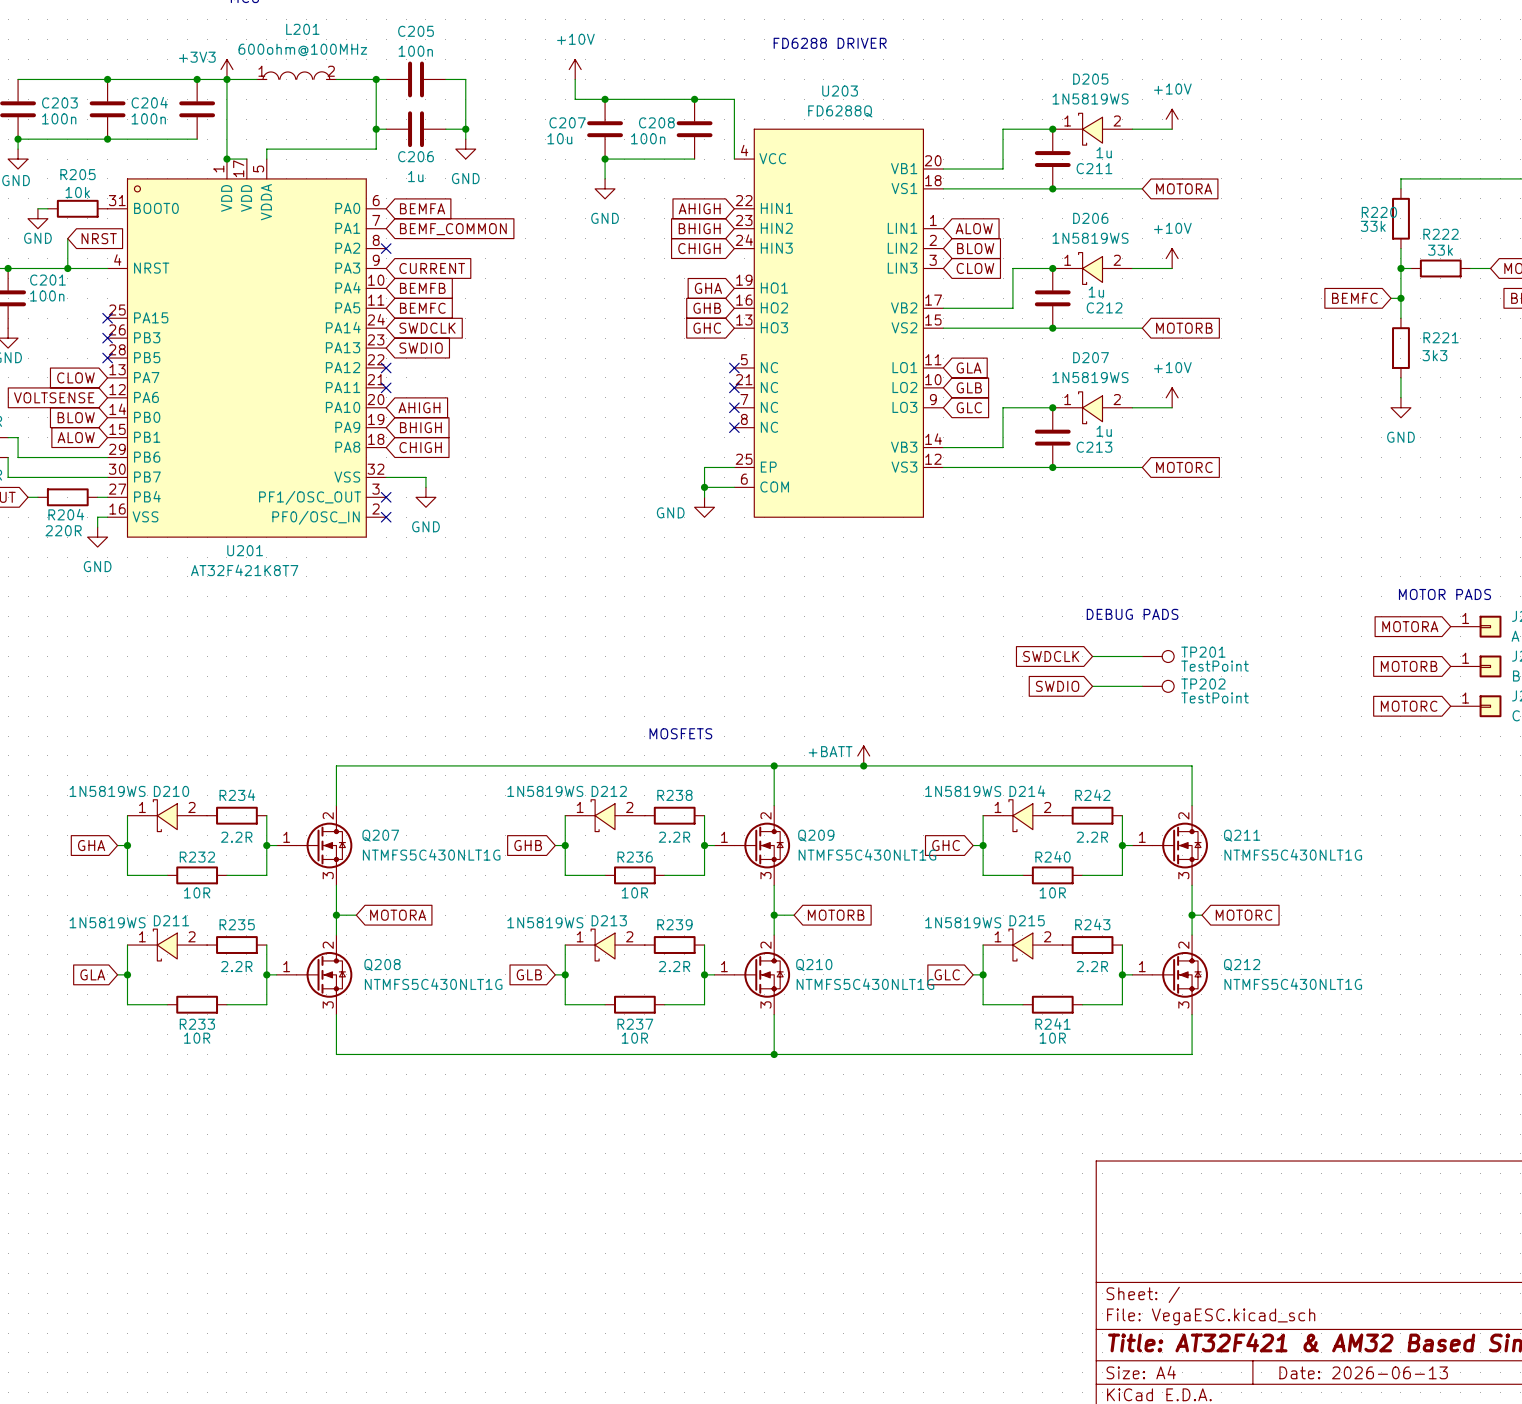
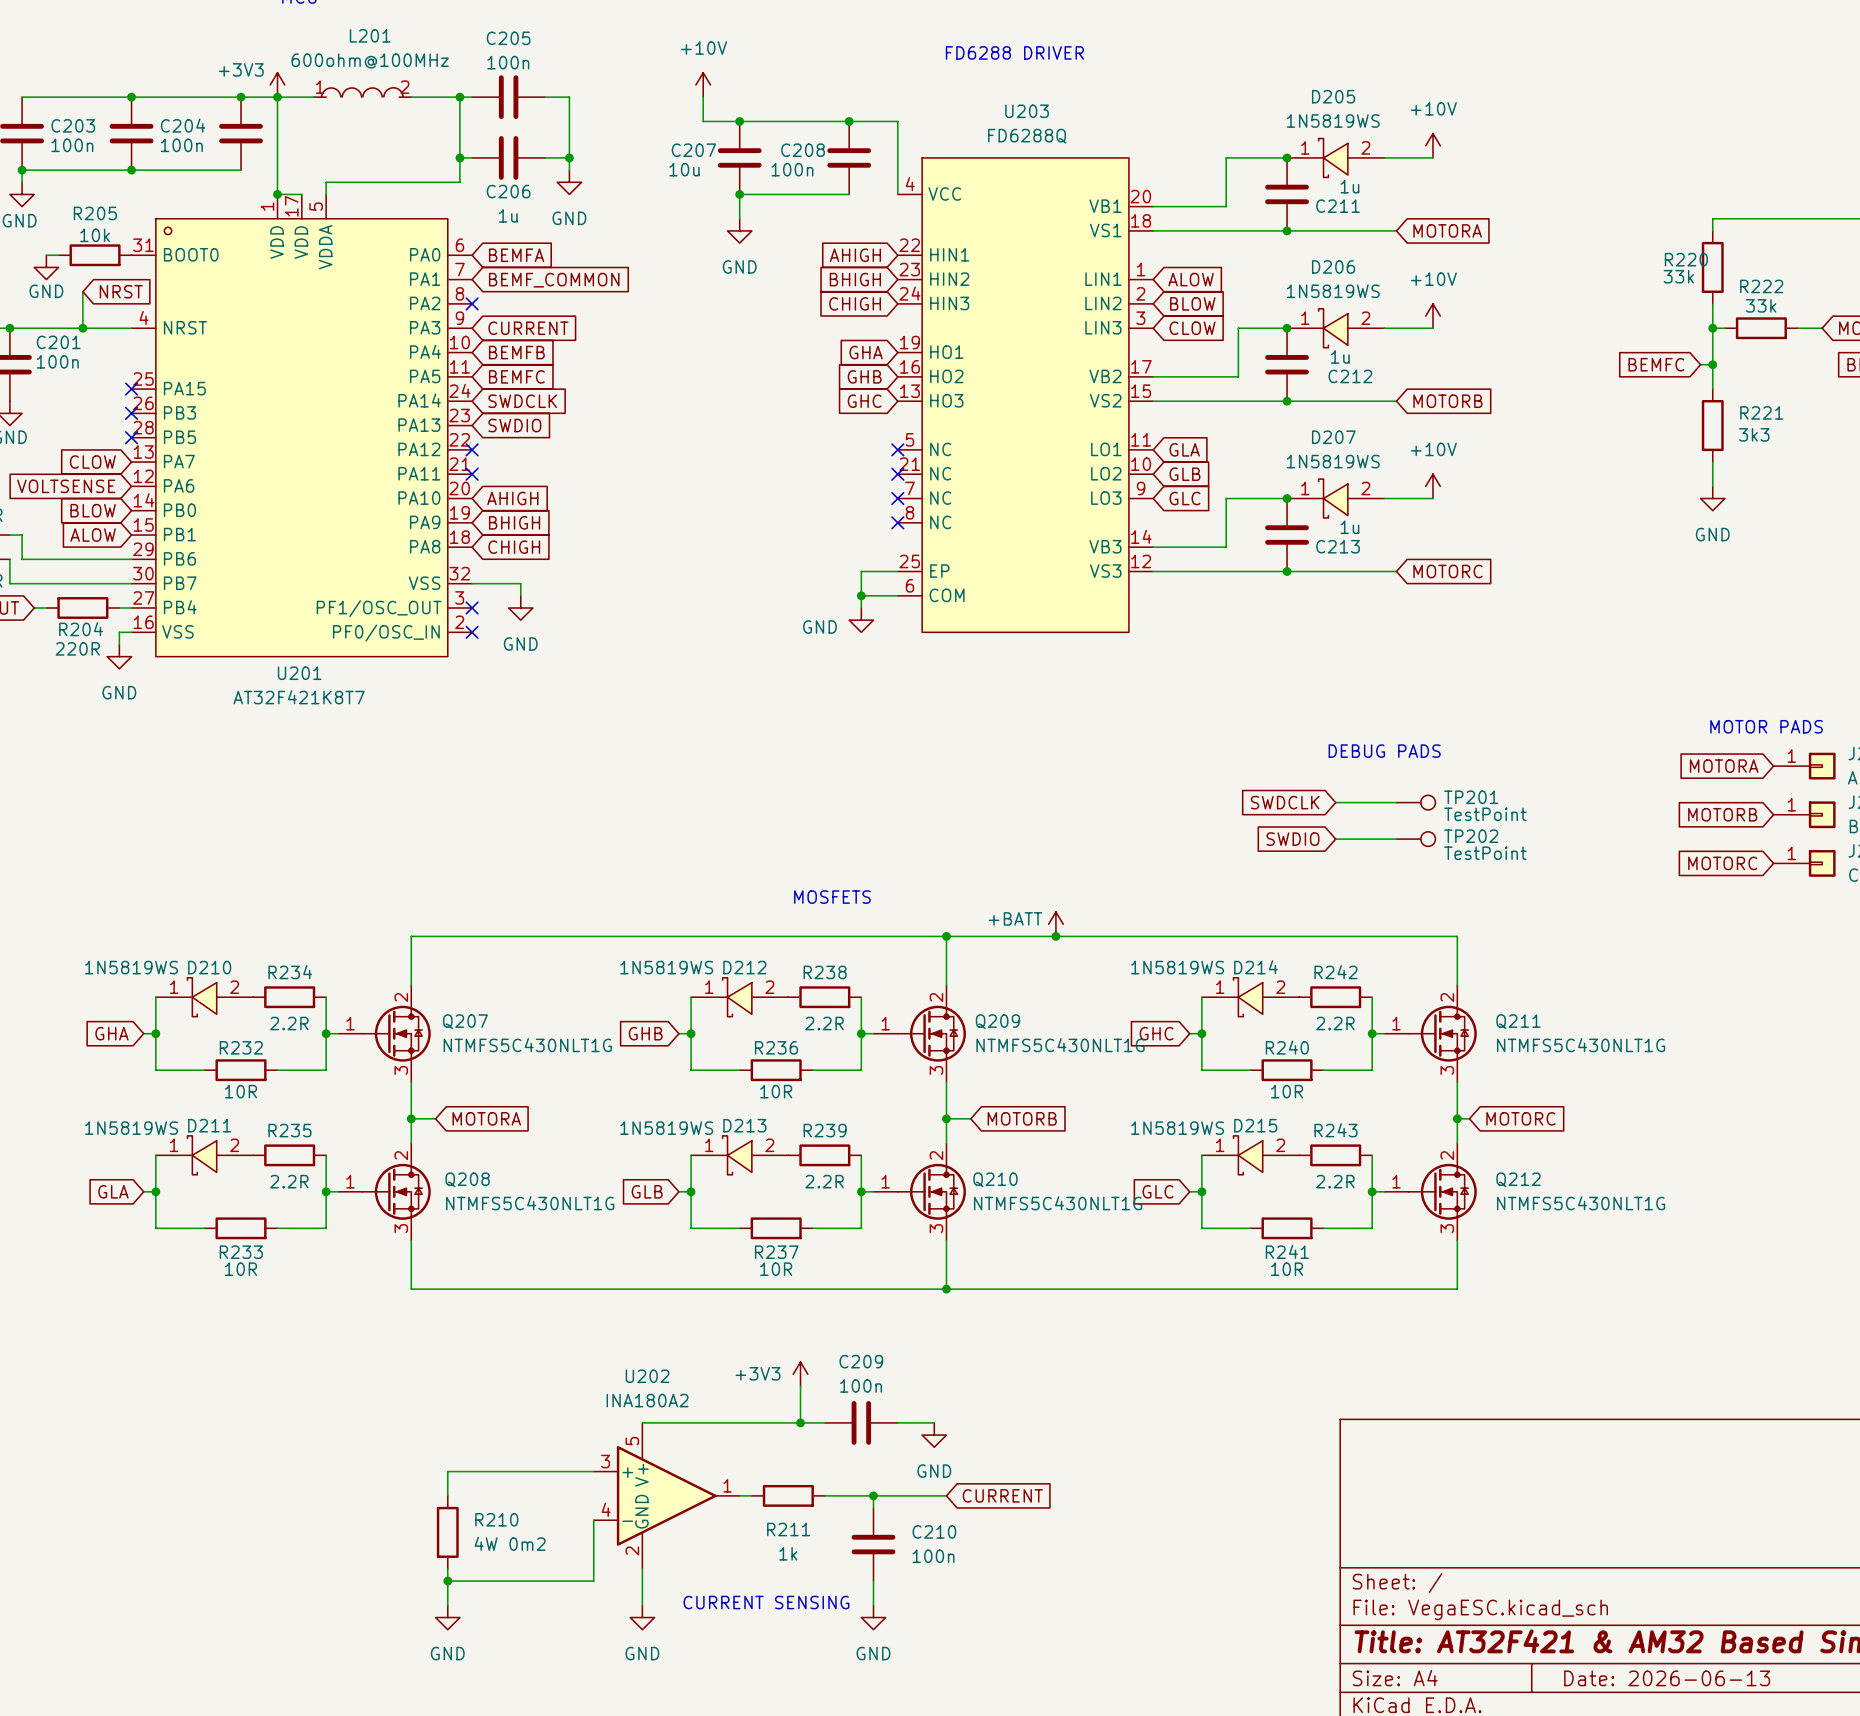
power symbol: none -> +3V3 (800, 1374)
wire: none -> (800, 1386) (800, 1422)
wire: none -> (642, 1422) (824, 1422)
junction: none -> (800, 1422)
C209: none -> 100n (861, 1422)
wire: none -> (897, 1422) (934, 1422)
power symbol: none -> GND (934, 1435)
wire: none -> (593, 1471) (447, 1471) (447, 1495)
U202: none -> INA180A2 (666, 1495)
wire: none -> (739, 1495) (751, 1495)
R211: none -> 1k (788, 1495)
wire: none -> (824, 1495) (946, 1495)
wire: none -> (873, 1495) (873, 1508)
junction: none -> (873, 1495)
global label: none -> CURRENT (1002, 1495)
wire: none -> (593, 1520) (593, 1581) (447, 1581)
R210: none -> 4W 0m2 (447, 1532)
C210: none -> 100n (873, 1544)
wire: none -> (447, 1568) (447, 1605)
wire: none -> (642, 1568) (642, 1605)
junction: none -> (447, 1581)
wire: none -> (873, 1581) (873, 1605)
text: none -> CURRENT SENSING (766, 1602)
power symbol: none -> GND (447, 1617)
power symbol: none -> GND (642, 1617)
power symbol: none -> GND (873, 1617)

